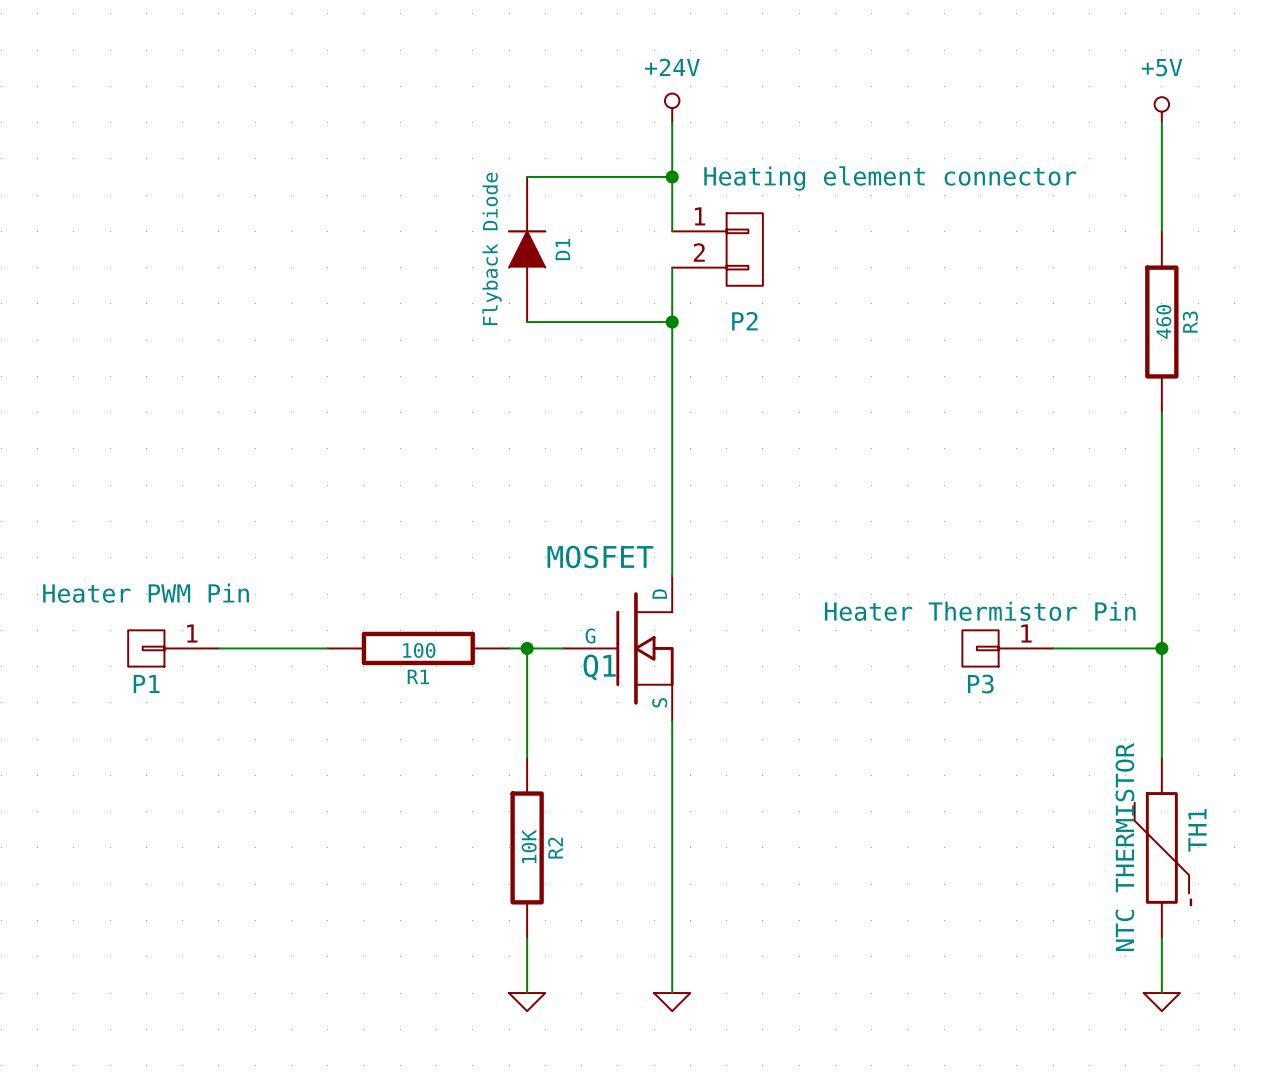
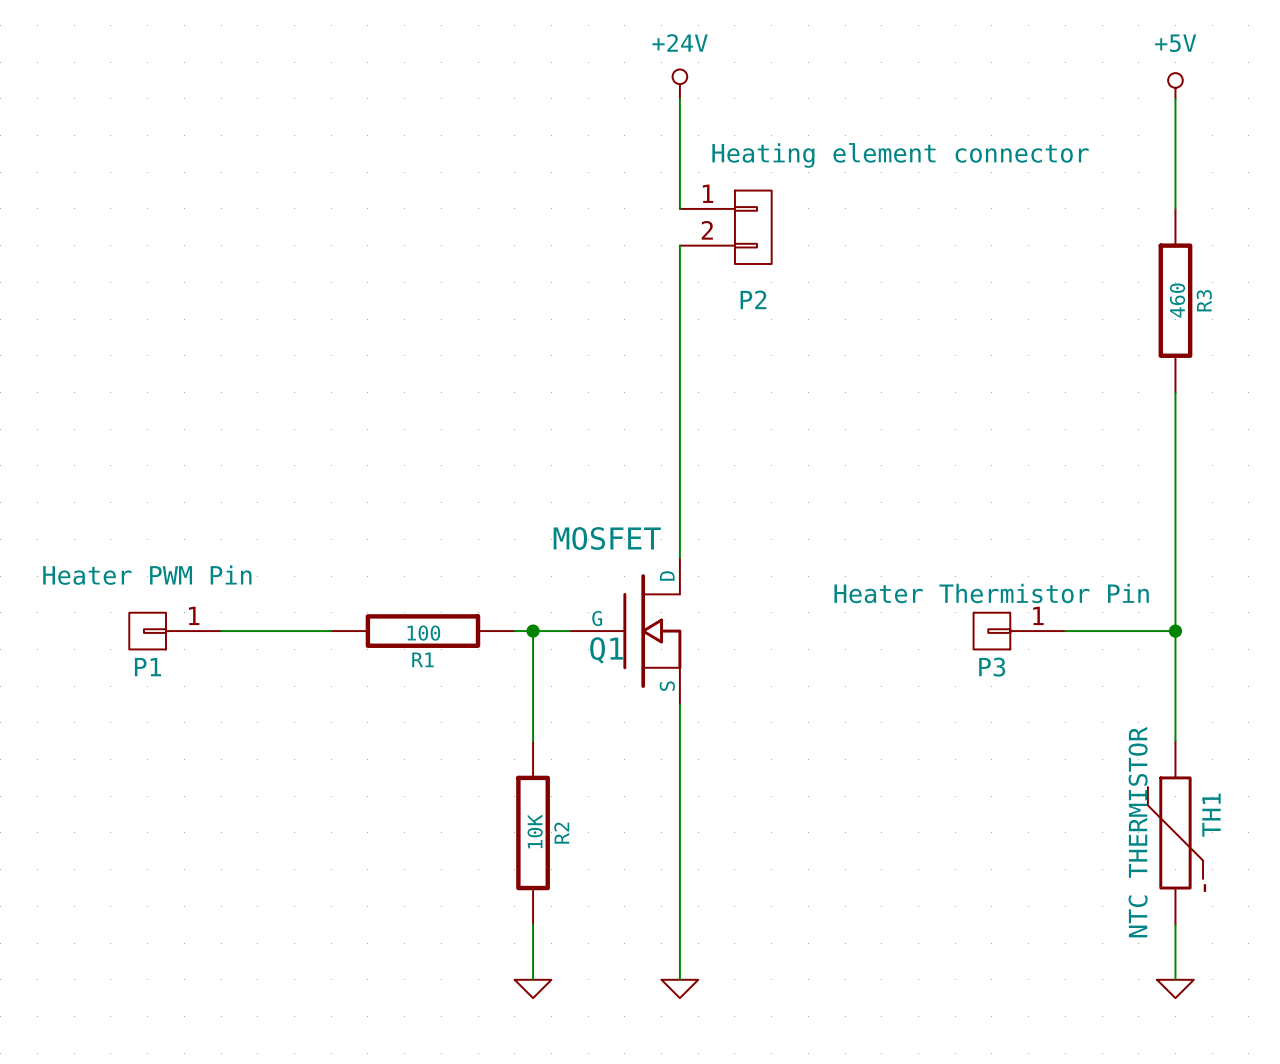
wire: (527, 176) (672, 176) -> none
junction: (672, 176) -> none
D1: Flyback Diode (527, 249) -> none
wire: (527, 322) (672, 322) -> none
junction: (672, 322) -> none

